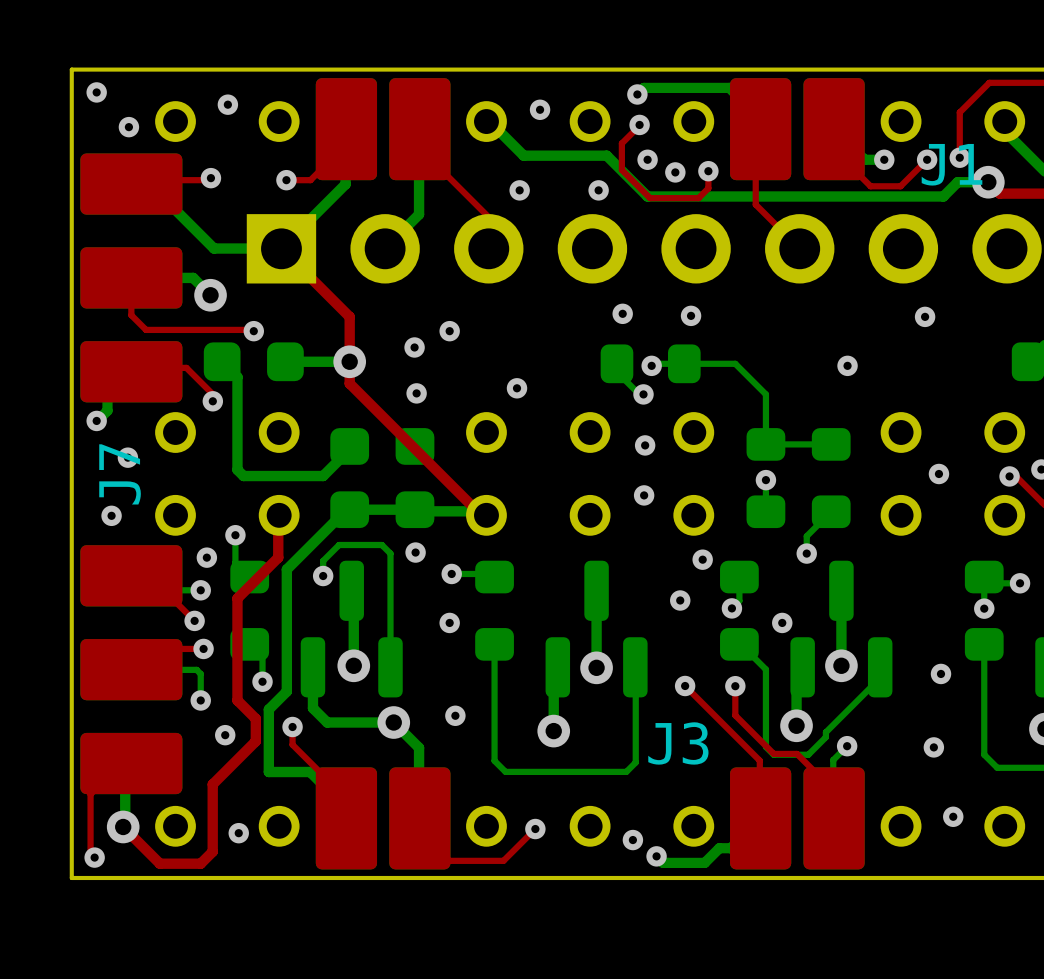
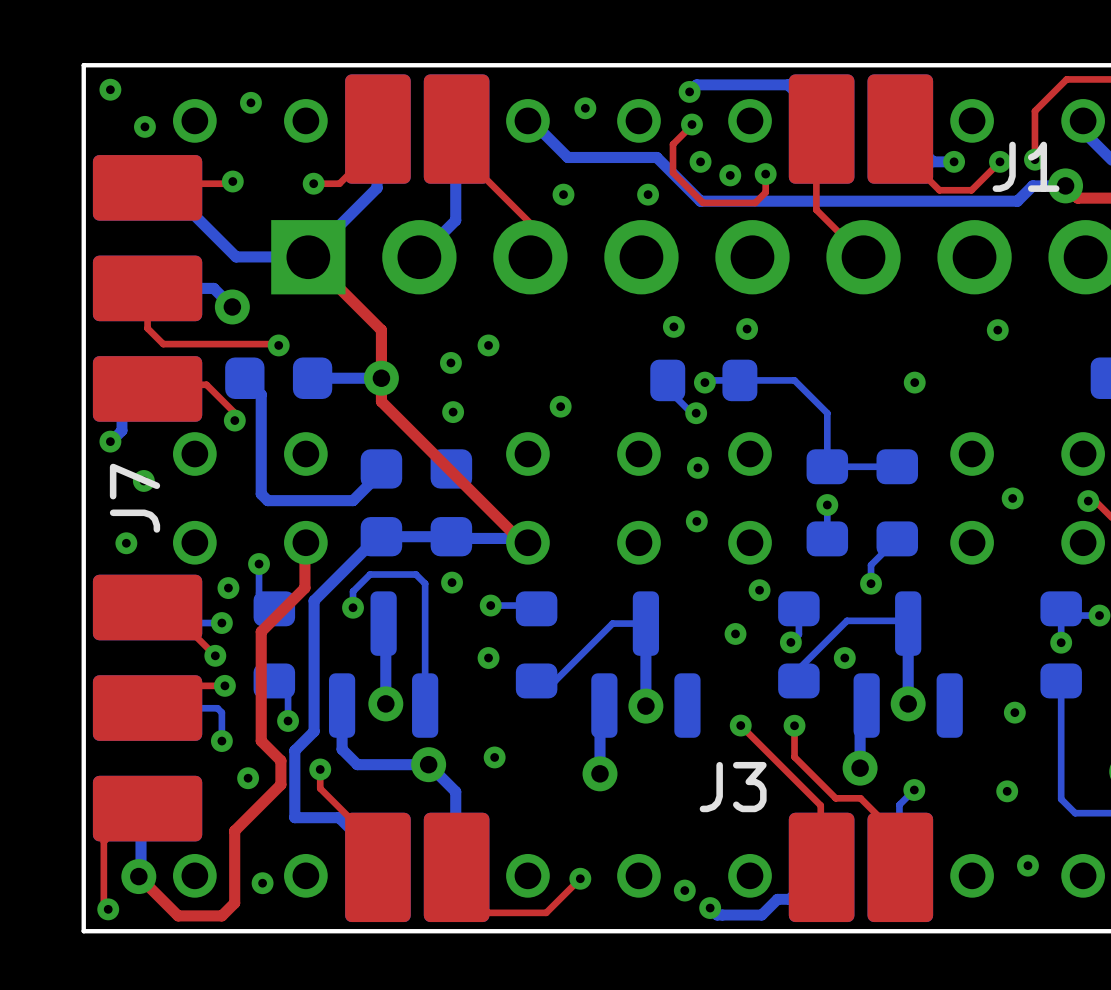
bottom track: (494, 644) (494, 760) (505, 771) (626, 771) (635, 762) (635, 667) -> (536, 680) (555, 680) (612, 623) (645, 623)
bottom track: (739, 644) (765, 669) (765, 747) (773, 754) (808, 754) (825, 737) (825, 732) (880, 678) (880, 667) -> (798, 680) (798, 668) (846, 620) (905, 620) (908, 623)

